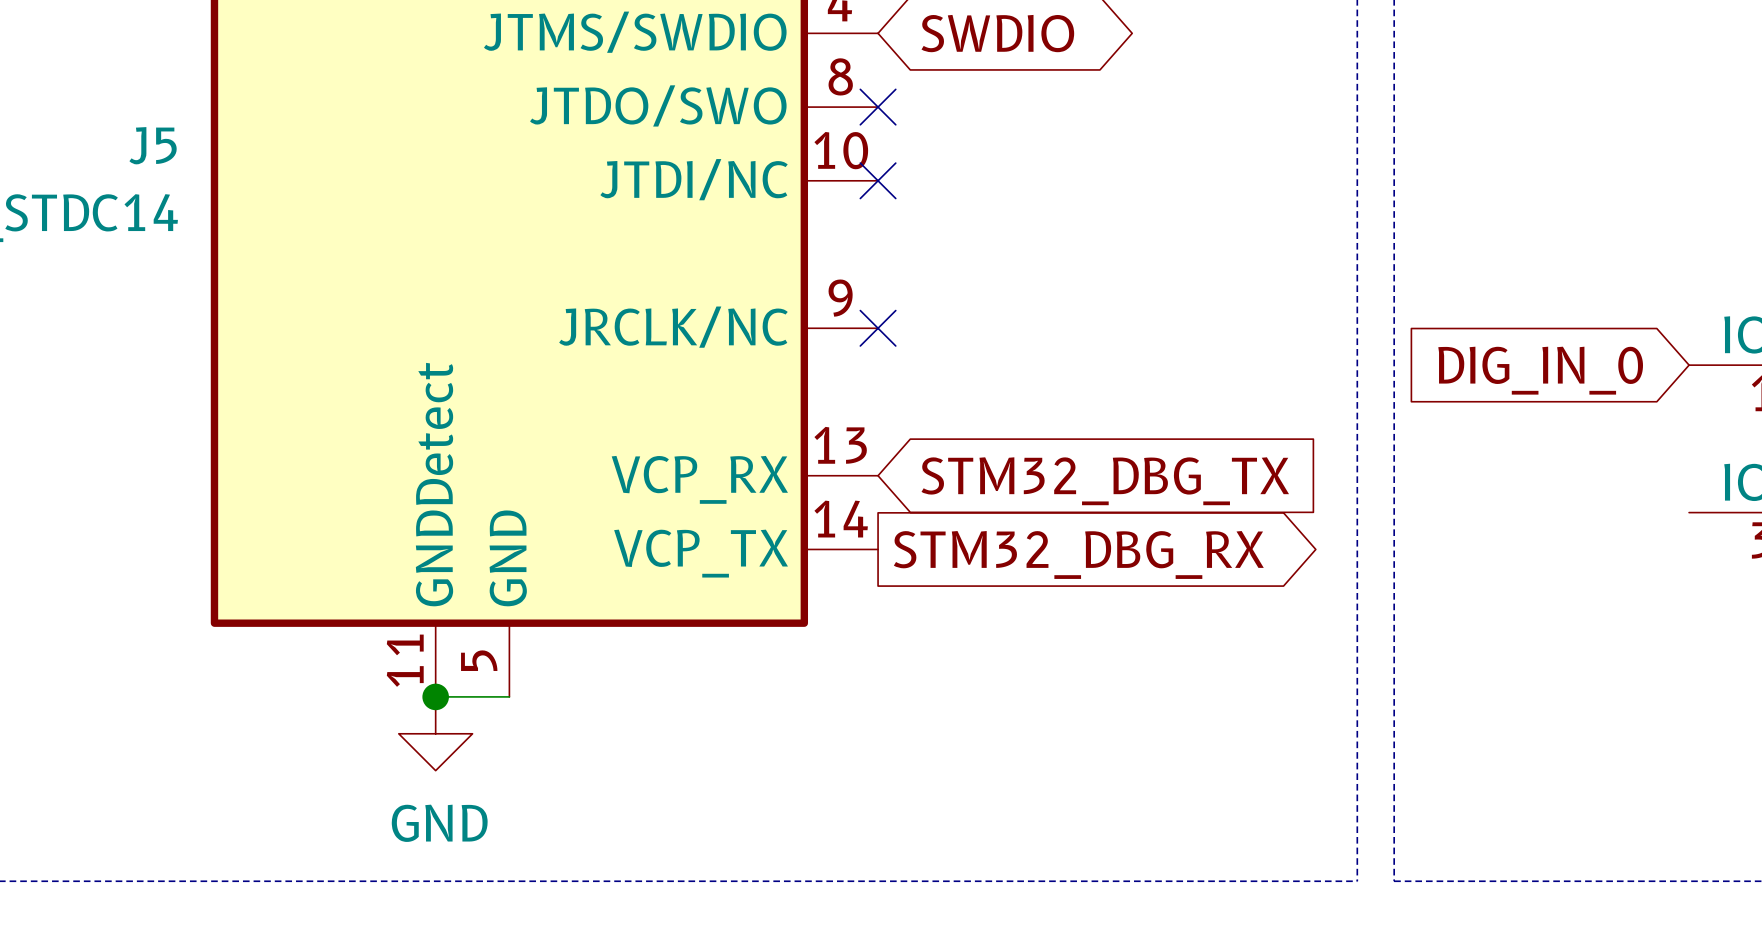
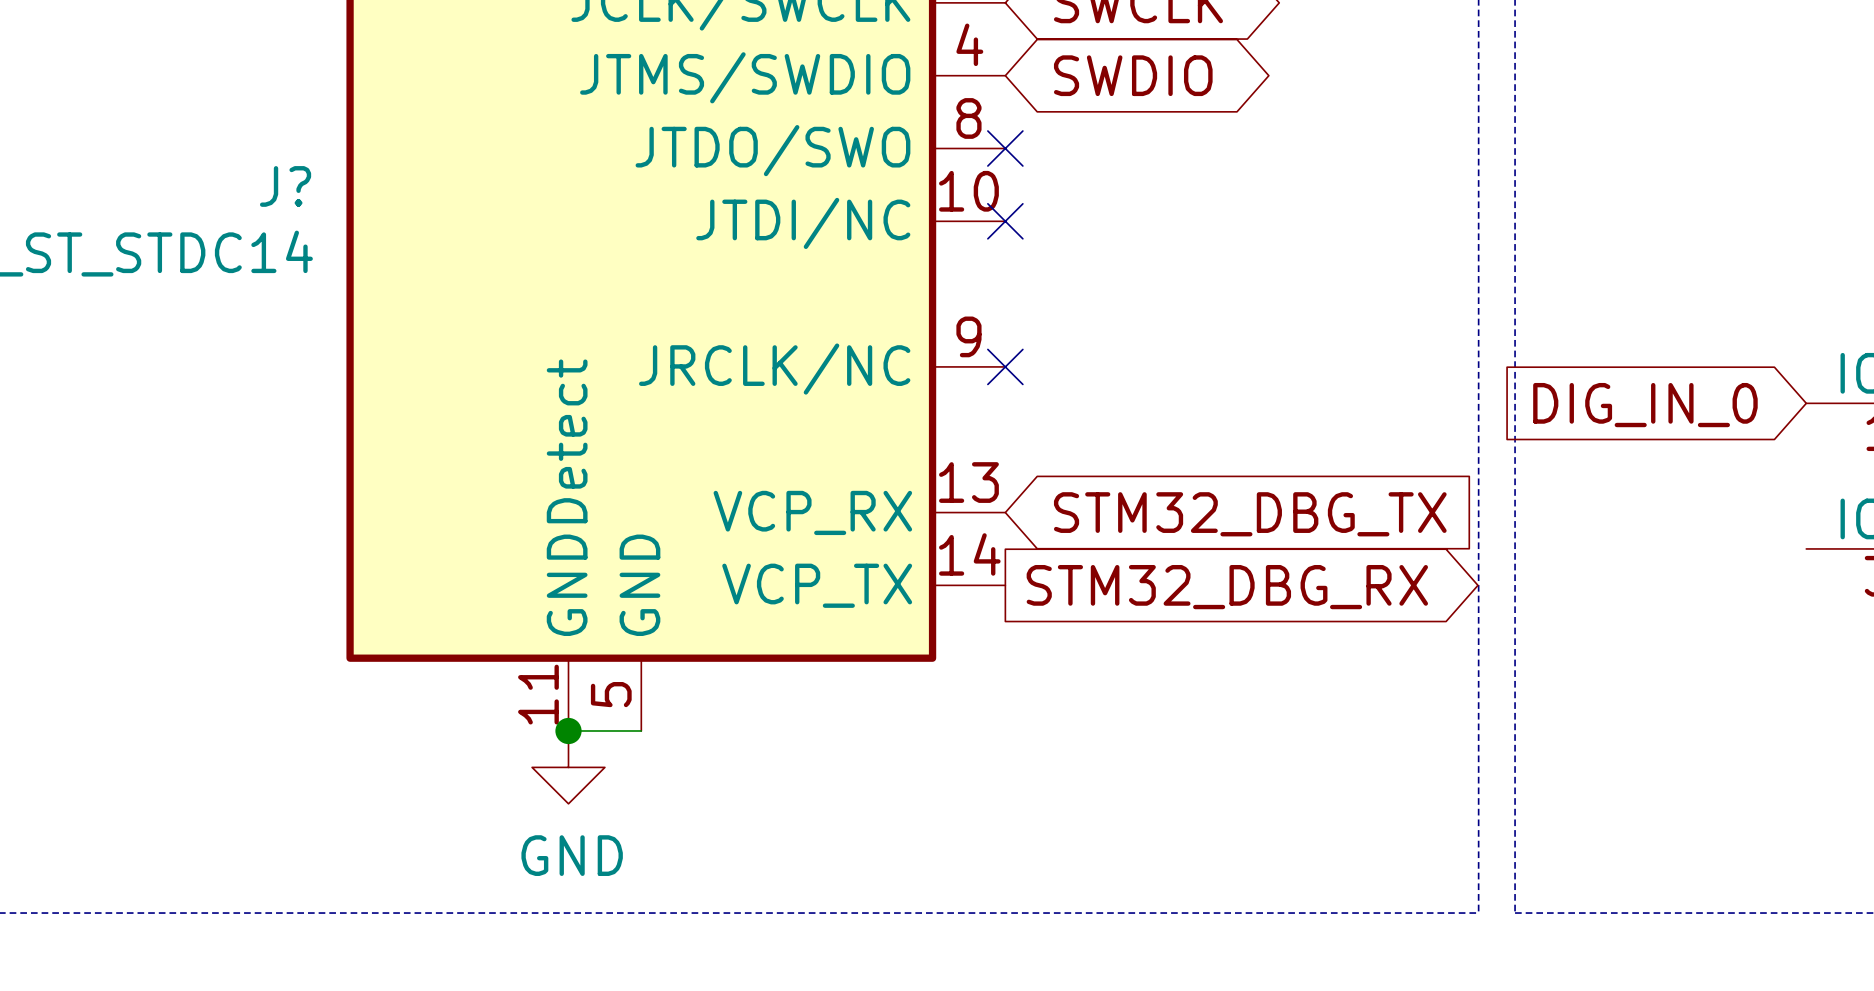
J5 name: J5 (153, 145) -> J? (285, 186)

